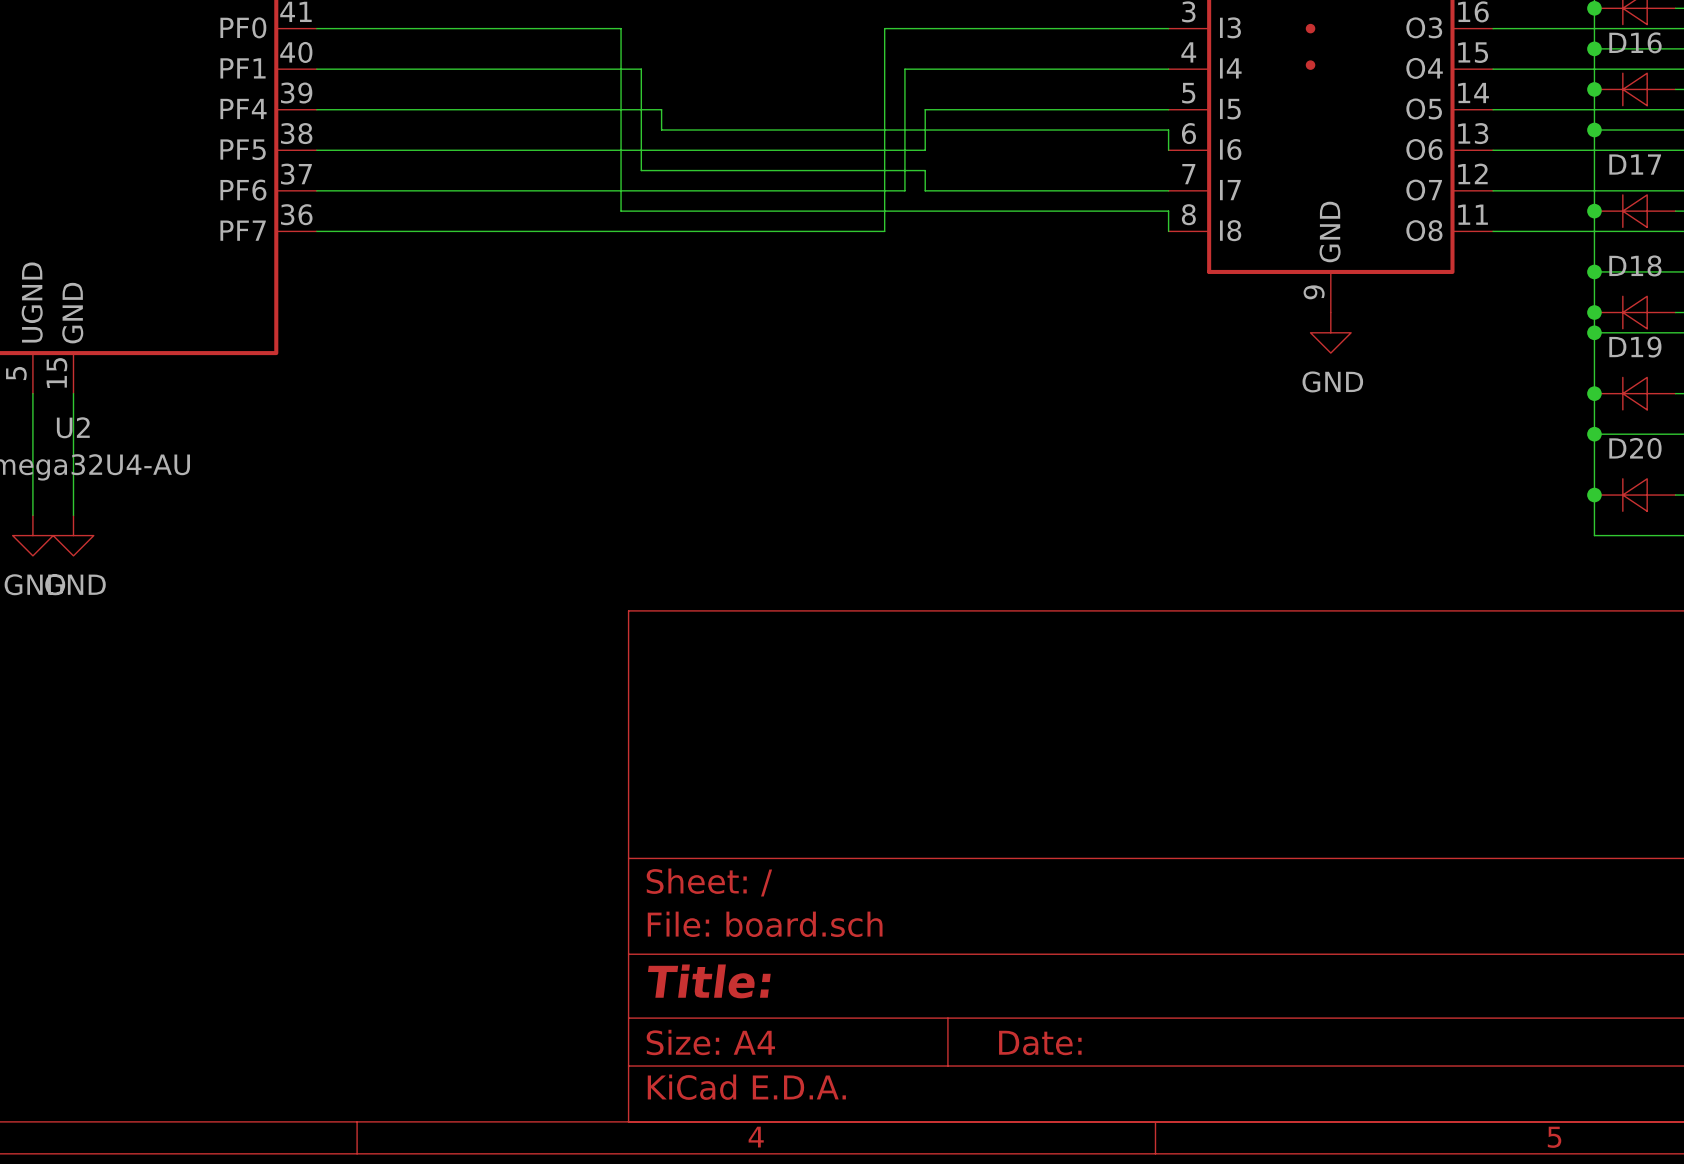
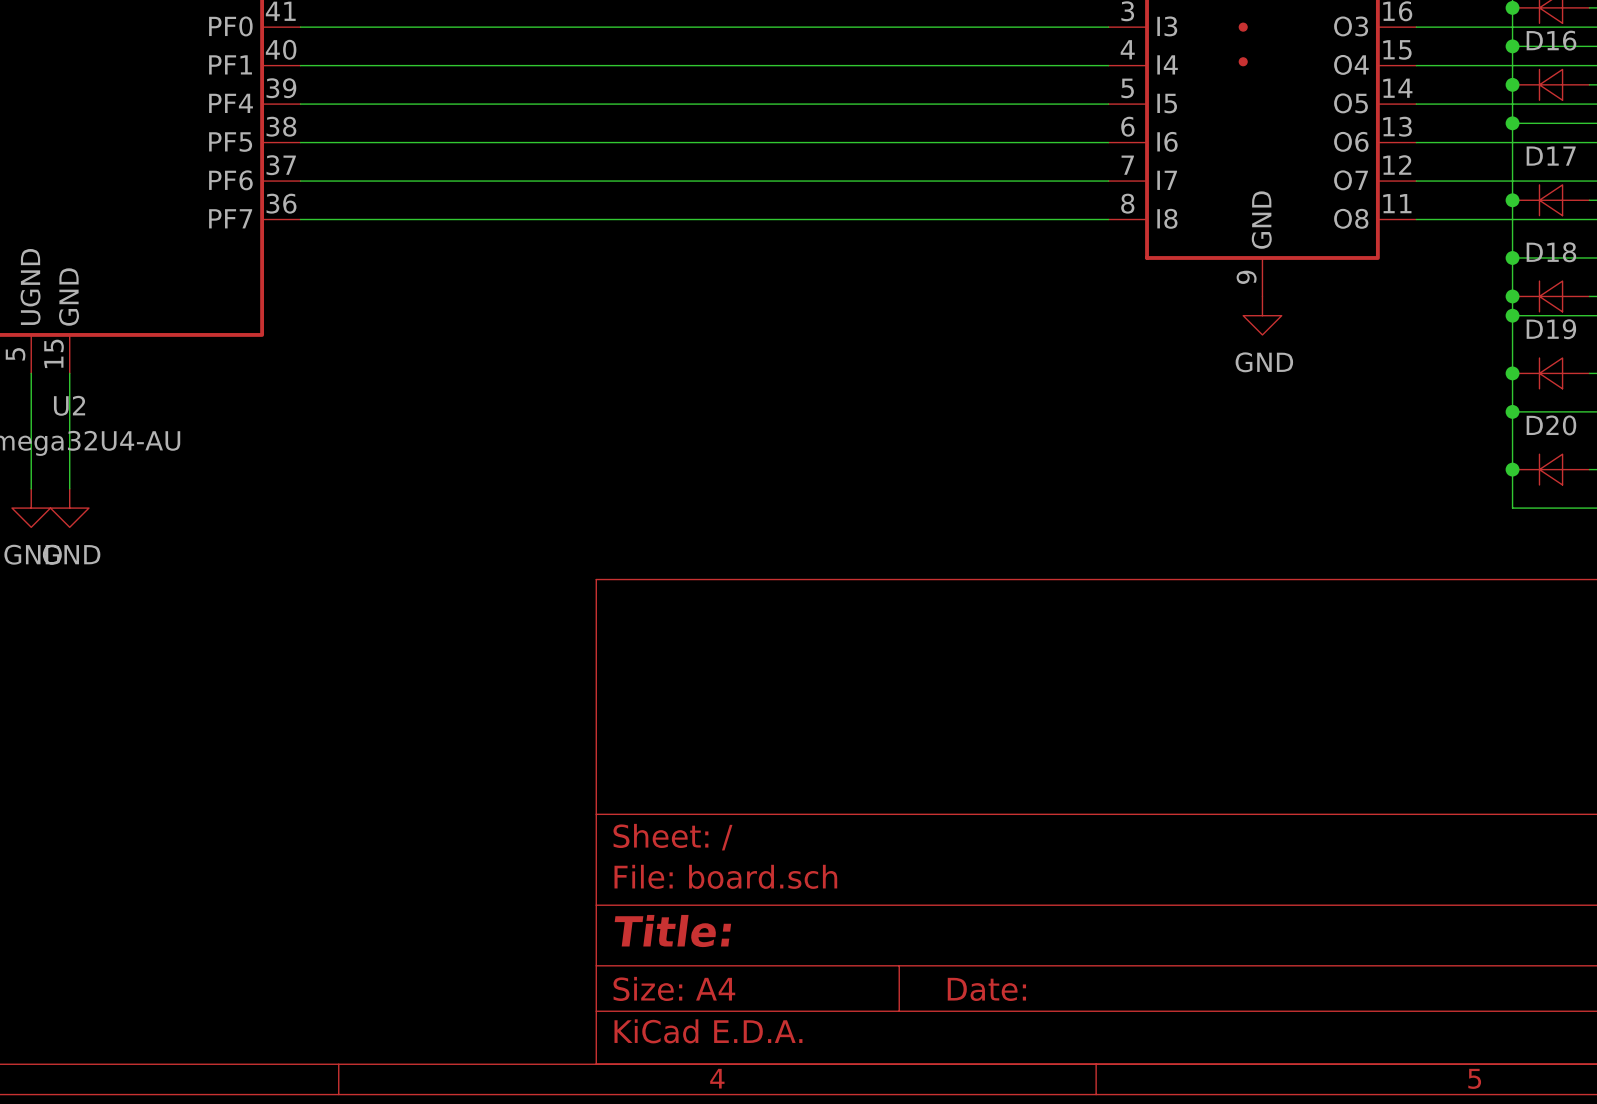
wire: (621, 28) (621, 211) (1168, 211) (1168, 231) -> (839, 219) (1108, 219)
wire: (884, 28) (884, 231) -> (839, 27) (589, 27)
wire: (641, 69) (641, 170) (925, 170) (925, 190) -> (608, 65) (858, 65)
wire: (904, 69) (904, 190) -> (877, 181) (858, 181)
wire: (661, 109) (661, 130) (1168, 130) (1168, 150) -> (627, 104) (877, 104)
wire: (925, 109) (925, 150) -> (1108, 142) (877, 142)

